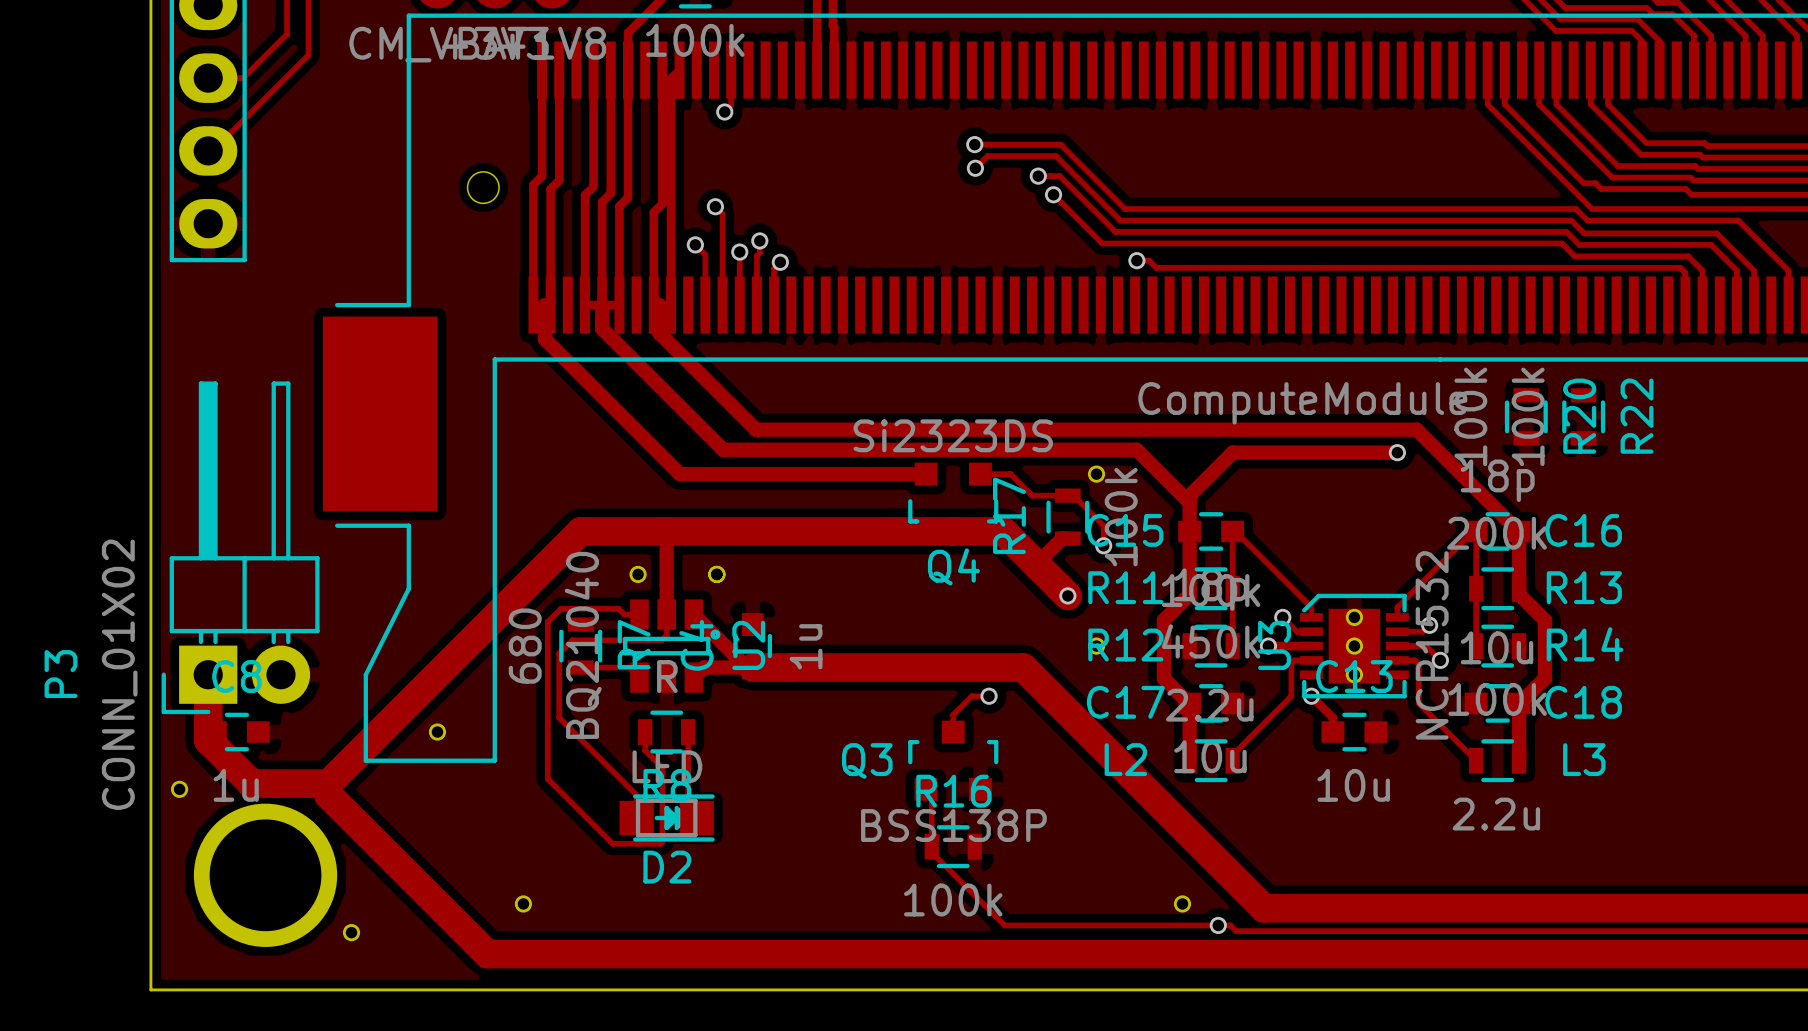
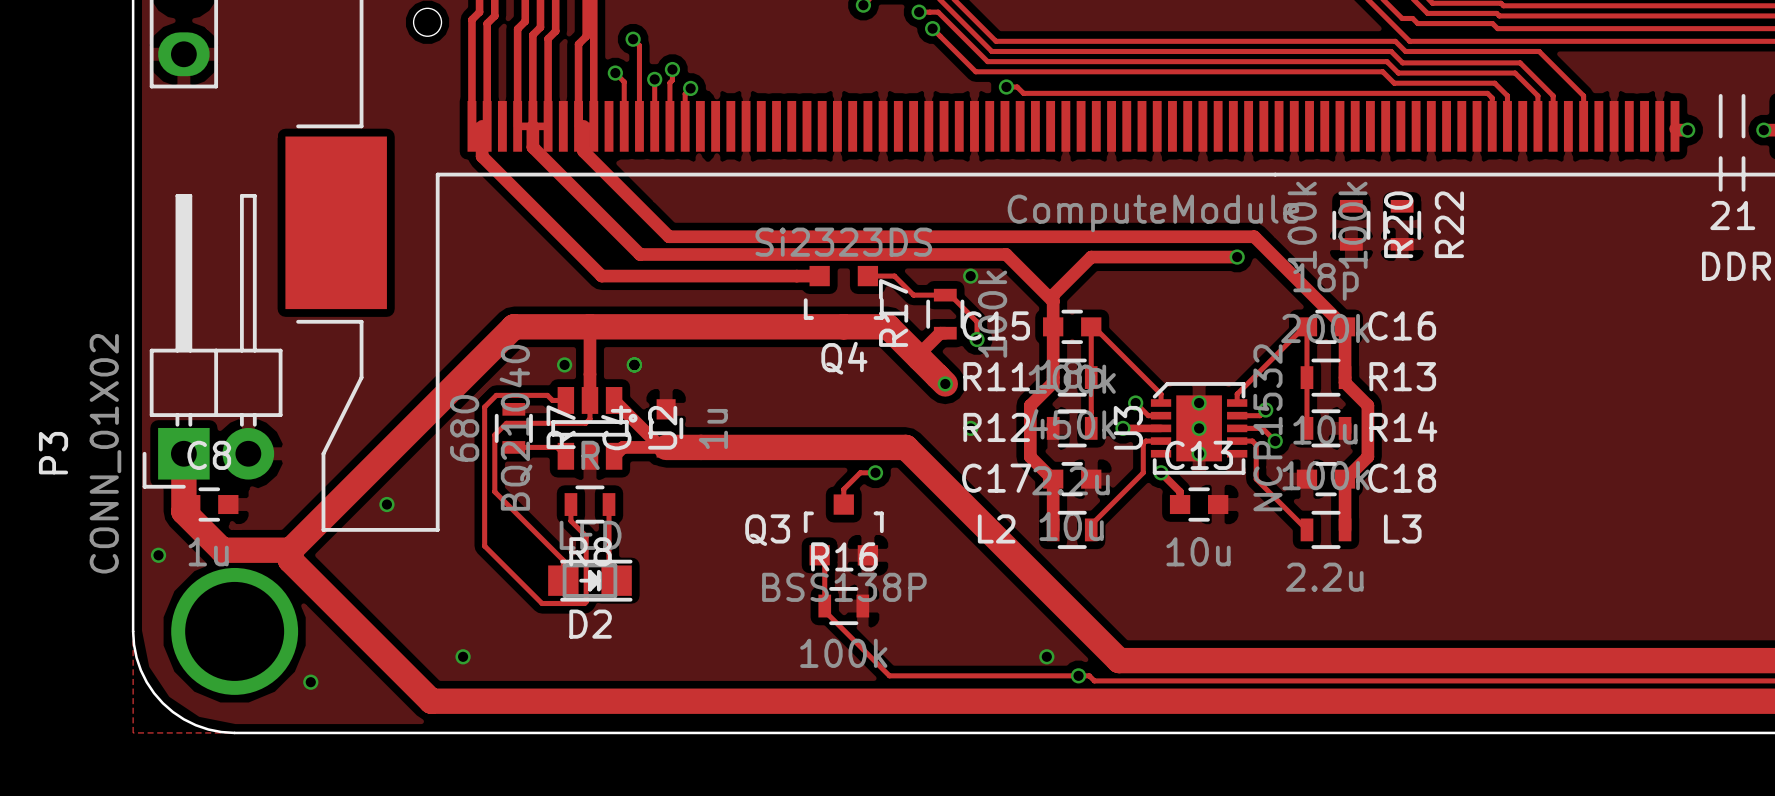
board edge: (150, 875) (150, 989) (265, 989) -> (133, 631) (136, 657) (140, 670) (154, 693) (162, 703) (183, 719) (195, 725) (208, 729) (234, 732)

